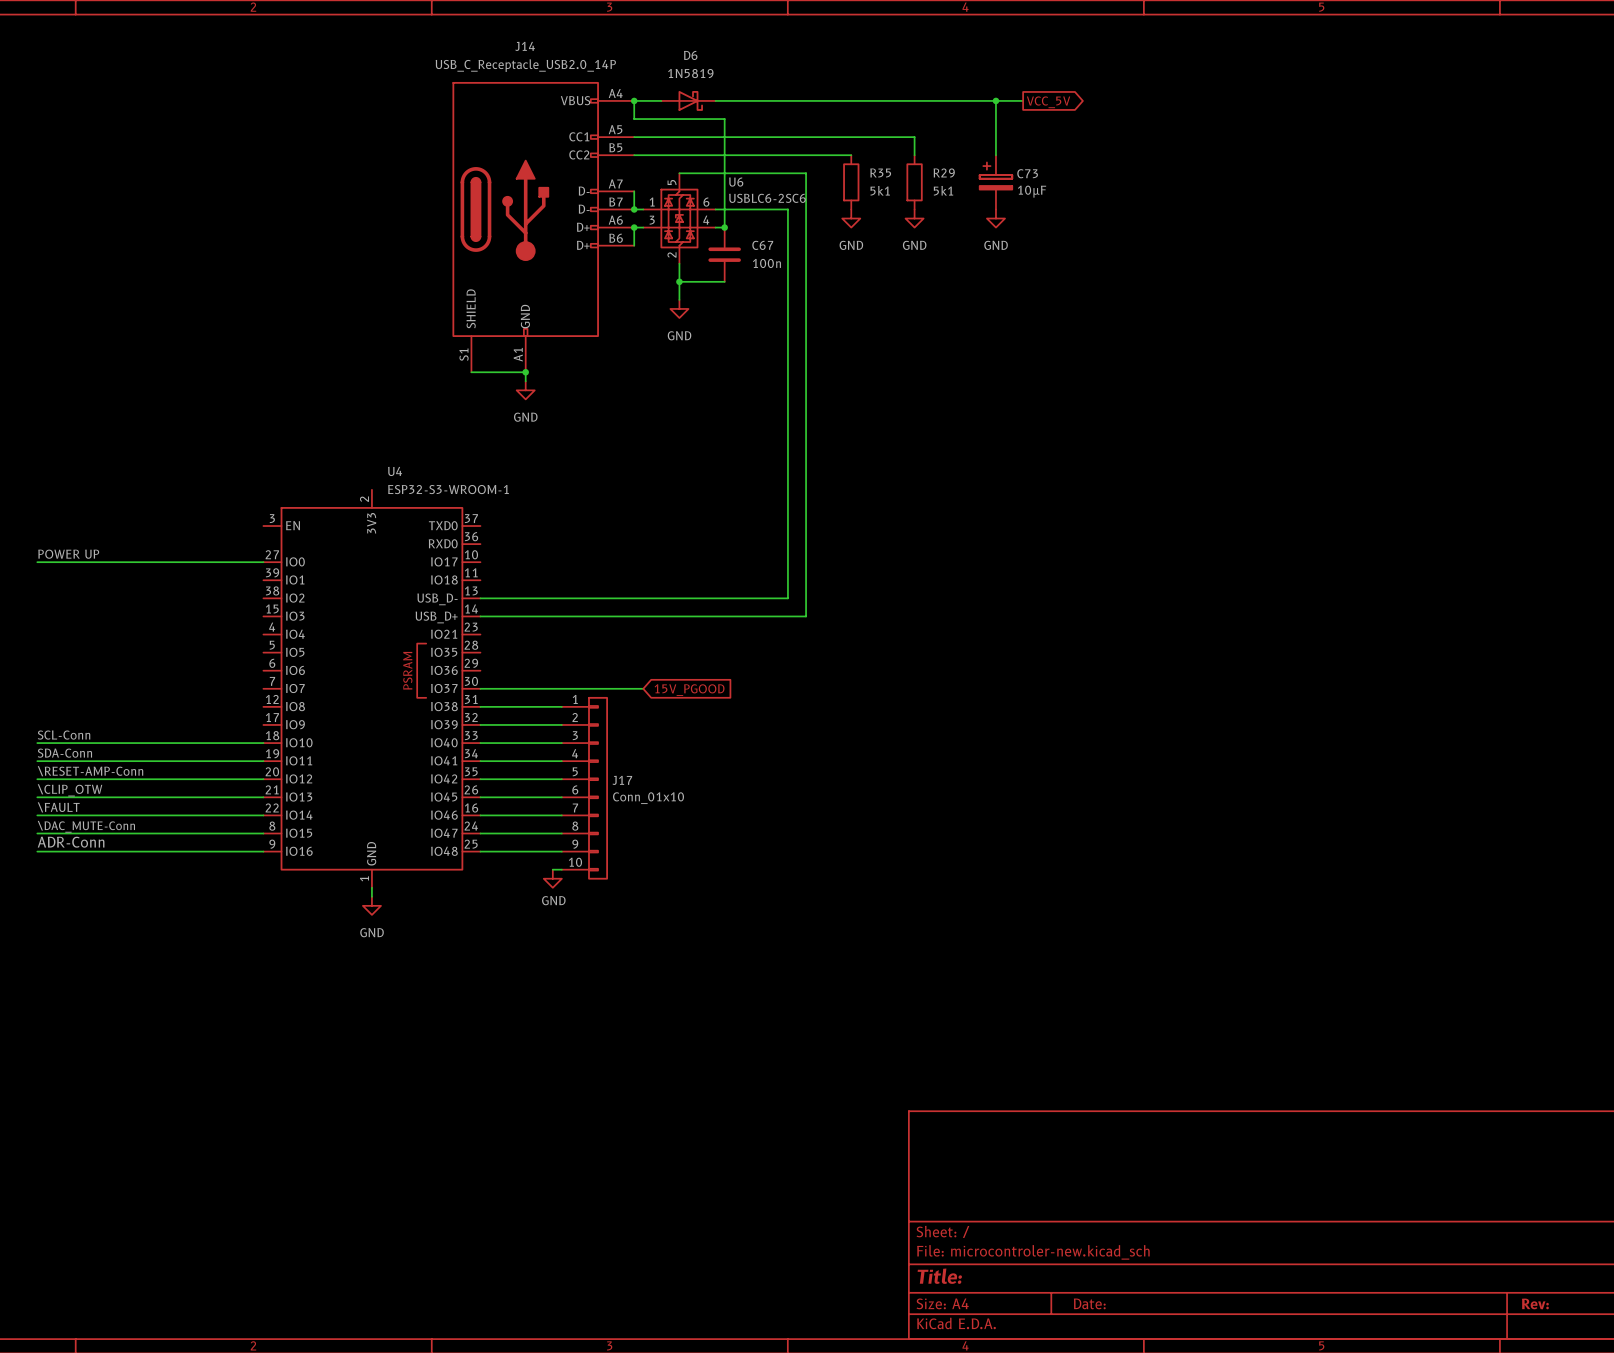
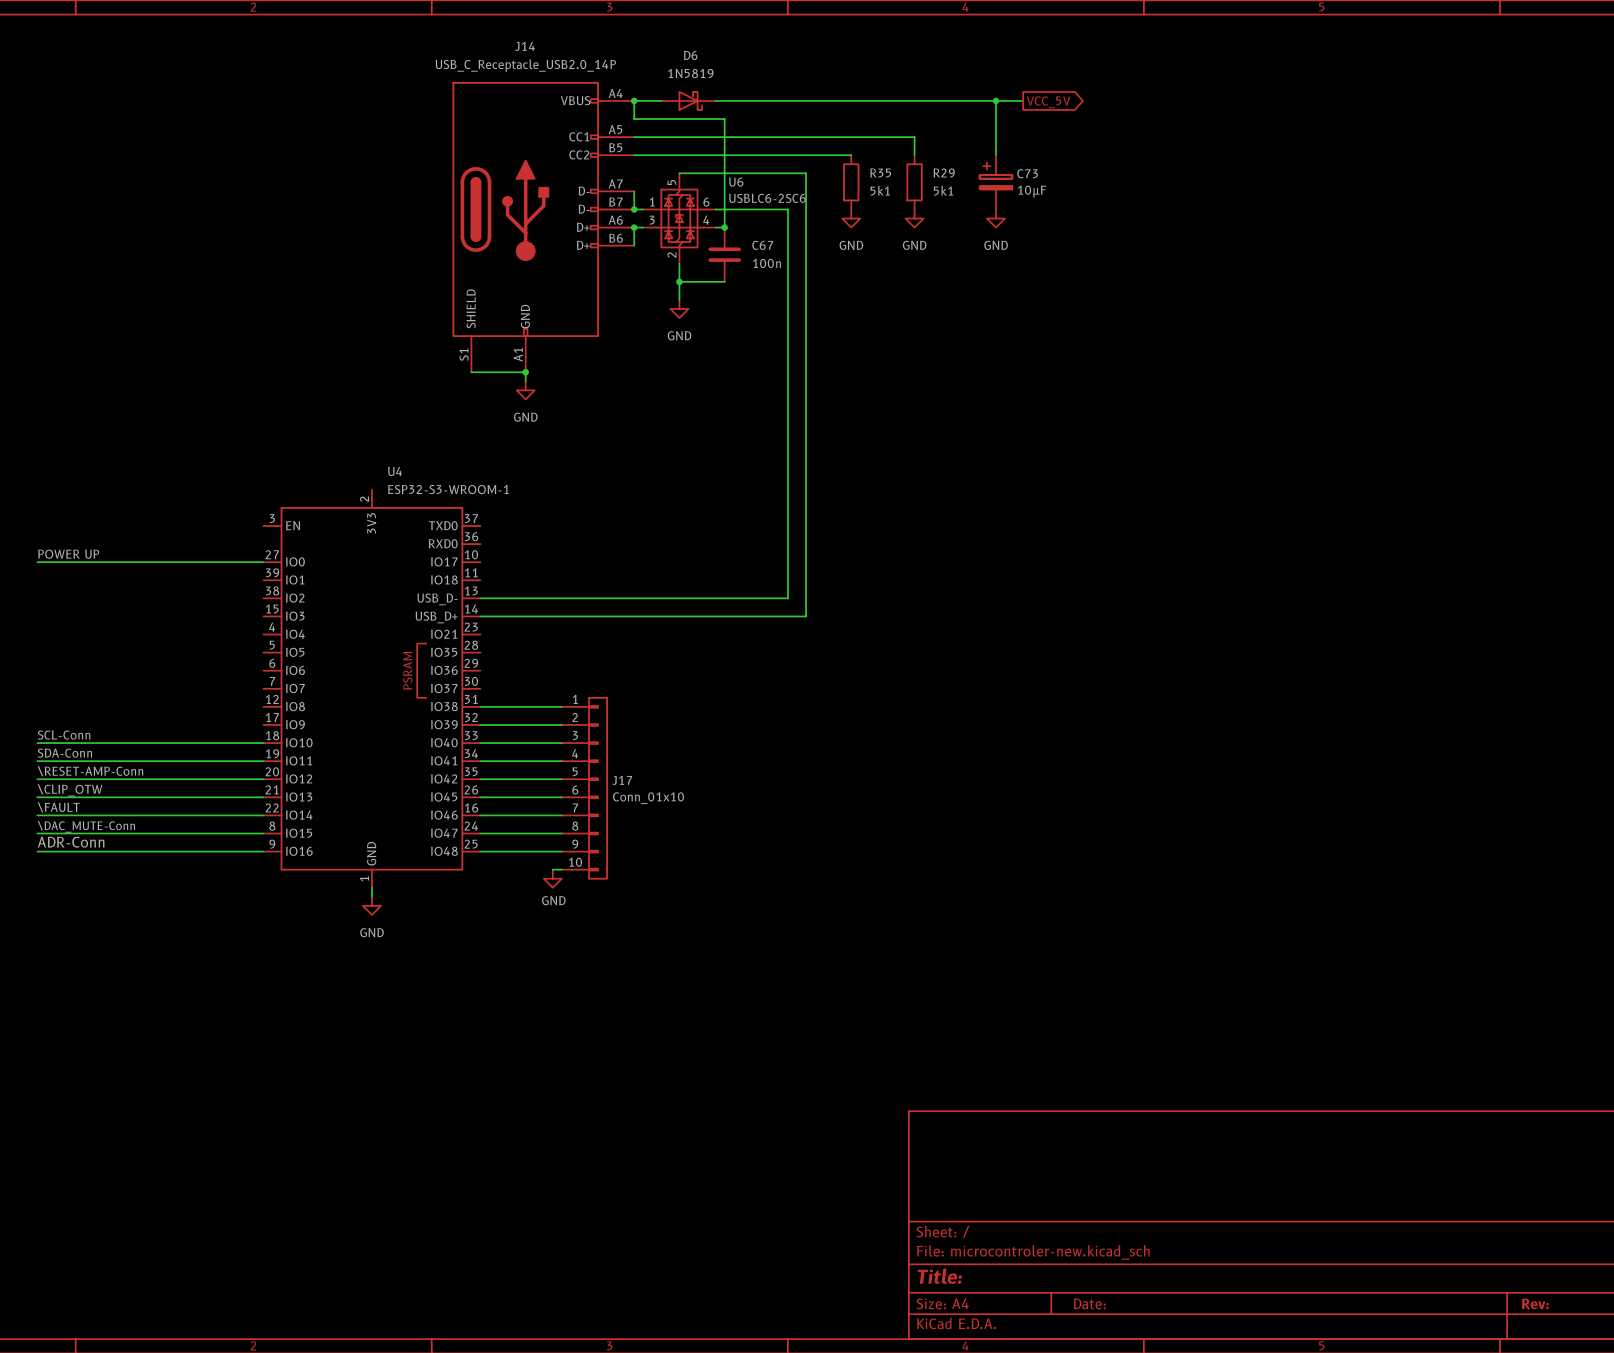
wire: (480, 688) (643, 688) -> none
global label: 15V_PGOOD (689, 690) -> none

